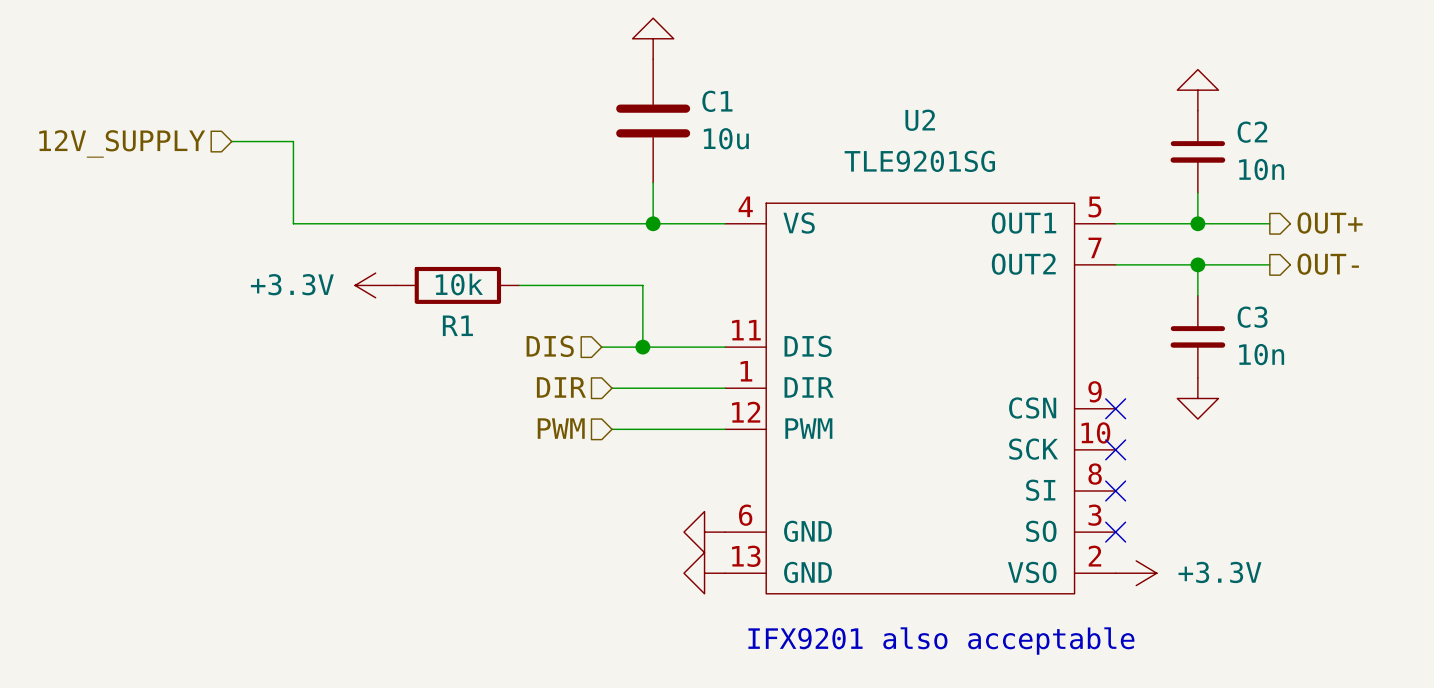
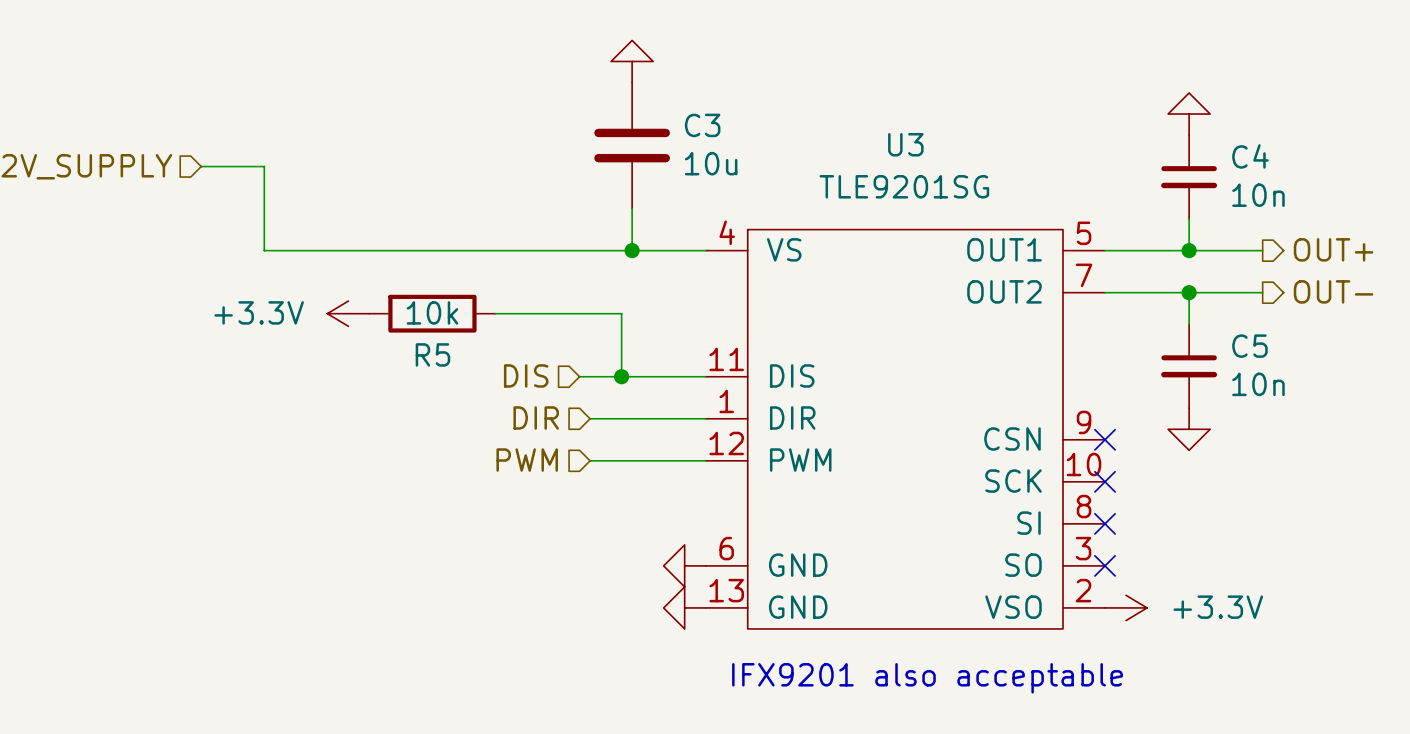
C1 name: C1 (717, 101) -> C3 (702, 125)
U2 name: U2 (920, 120) -> U3 (905, 144)
C2 name: C2 (1252, 132) -> C4 (1250, 156)
C3 name: C3 (1252, 317) -> C5 (1249, 346)
R1 name: R1 (457, 325) -> R5 (432, 354)

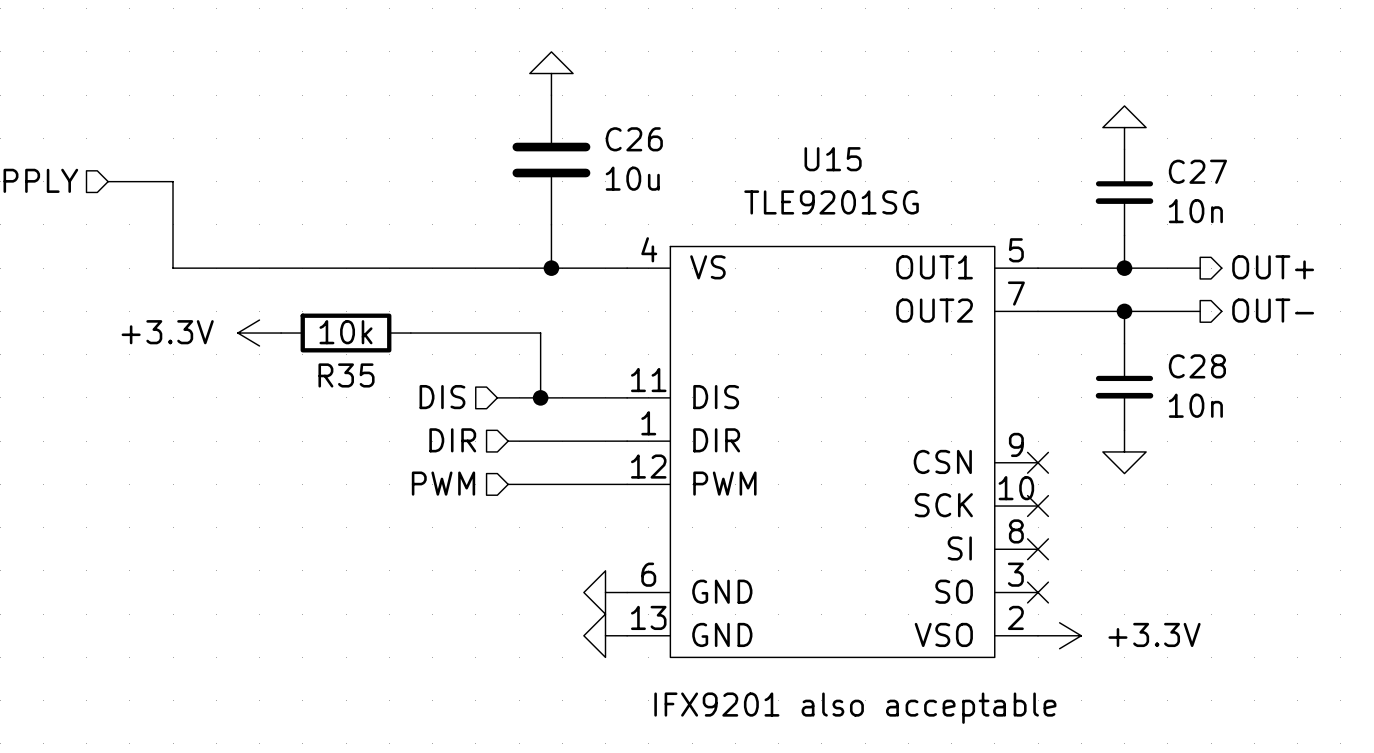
C3 name: C3 (702, 125) -> C26 (634, 139)
U3 name: U3 (905, 144) -> U15 (833, 159)
C4 name: C4 (1250, 156) -> C27 (1197, 171)
C5 name: C5 (1249, 346) -> C28 (1197, 366)
R5 name: R5 (432, 354) -> R35 (346, 375)

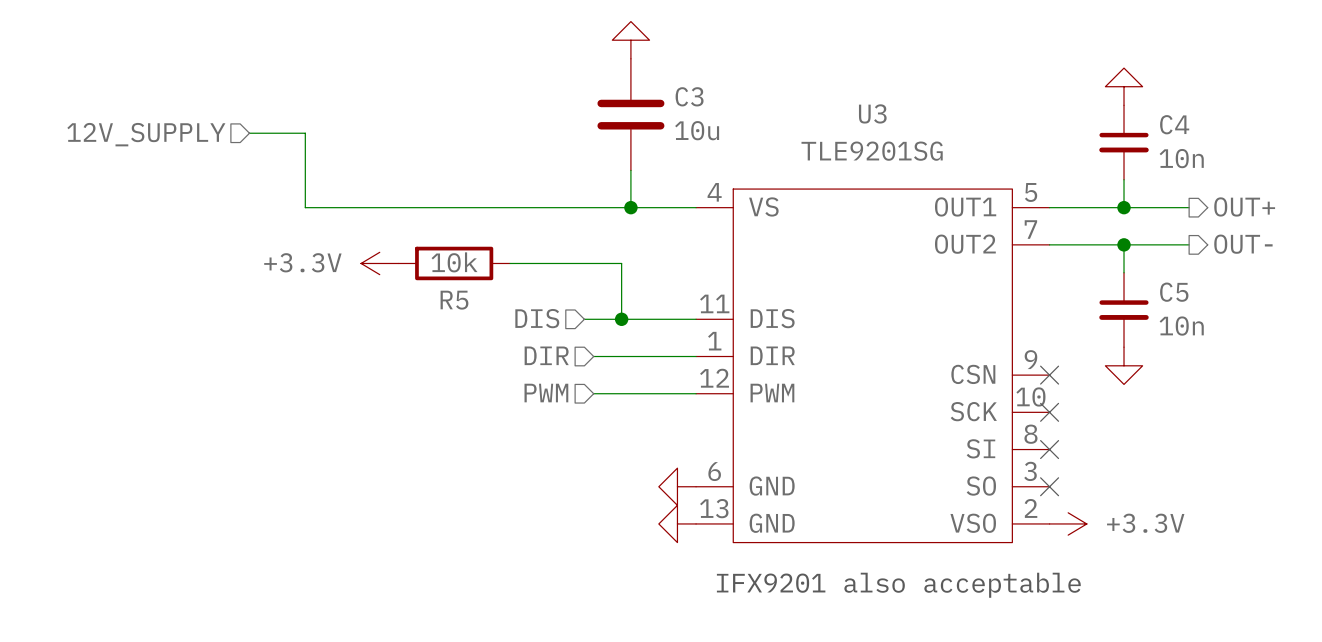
C26 name: C26 (634, 139) -> C3 (689, 96)
U15 name: U15 (833, 159) -> U3 (872, 113)
C27 name: C27 (1197, 171) -> C4 (1174, 124)
C28 name: C28 (1197, 366) -> C5 (1174, 292)
R35 name: R35 (346, 375) -> R5 (454, 300)

